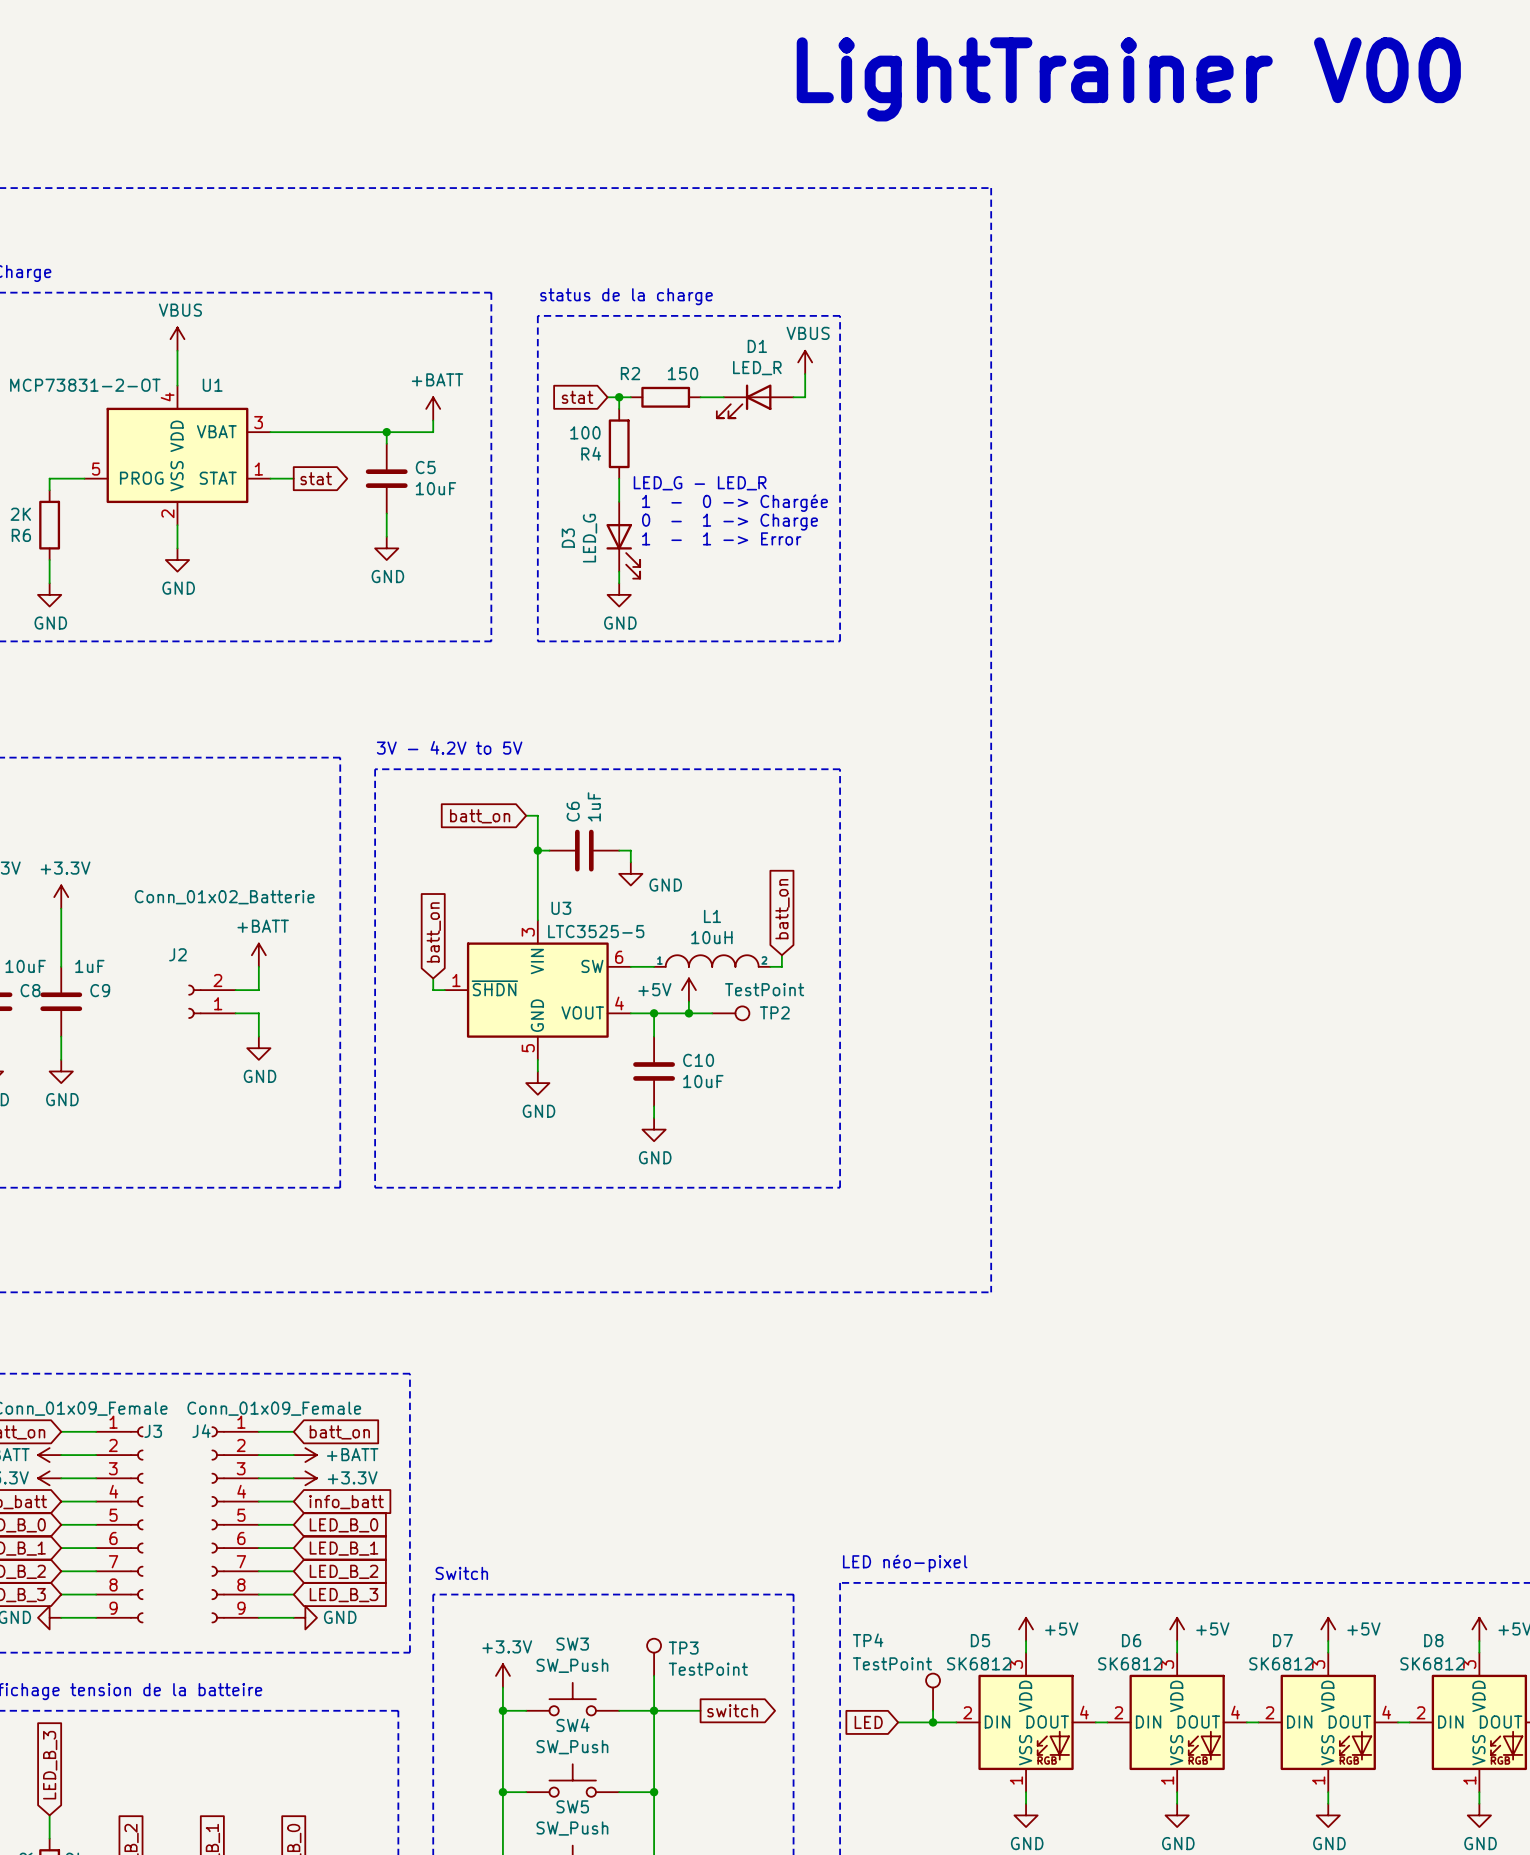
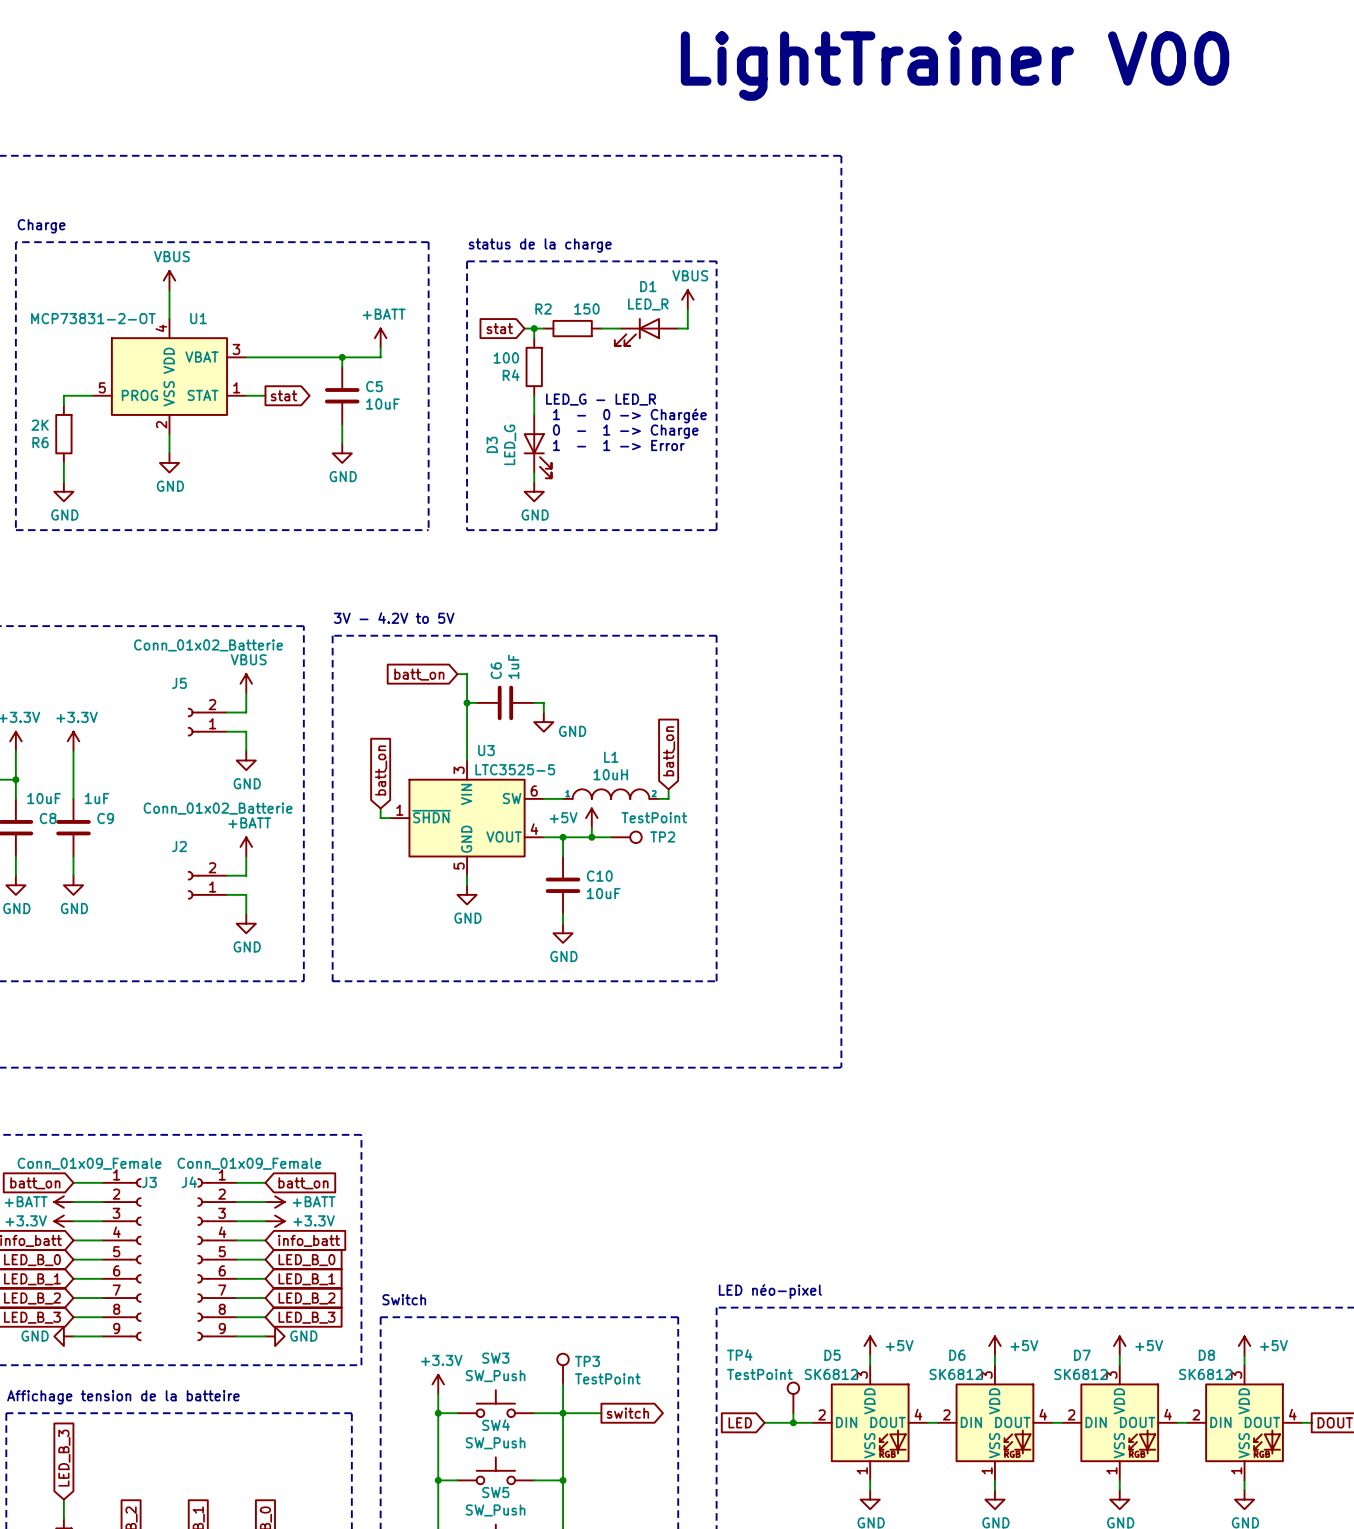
power symbol: none -> VBUS (246, 683)
wire: none -> (246, 693) (246, 712) (227, 712)
J5: none -> Conn_01x02_Batterie (207, 722)
wire: none -> (227, 731) (246, 731) (246, 750)
J2 value position: Conn_01x02_Batterie (224, 897) -> Conn_01x02_Batterie (218, 808)
power symbol: none -> GND (246, 760)
power symbol position: +BATT (258, 955) -> +BATT (246, 846)
wire: (258, 966) (258, 990) (235, 990) -> (246, 856) (246, 875) (227, 875)
J2 position: (212, 1001) -> (207, 885)
wire: (235, 1013) (258, 1013) (258, 1036) -> (227, 894) (246, 894) (246, 914)
power symbol: GND (258, 1048) -> none
power symbol: none -> GND (246, 923)

